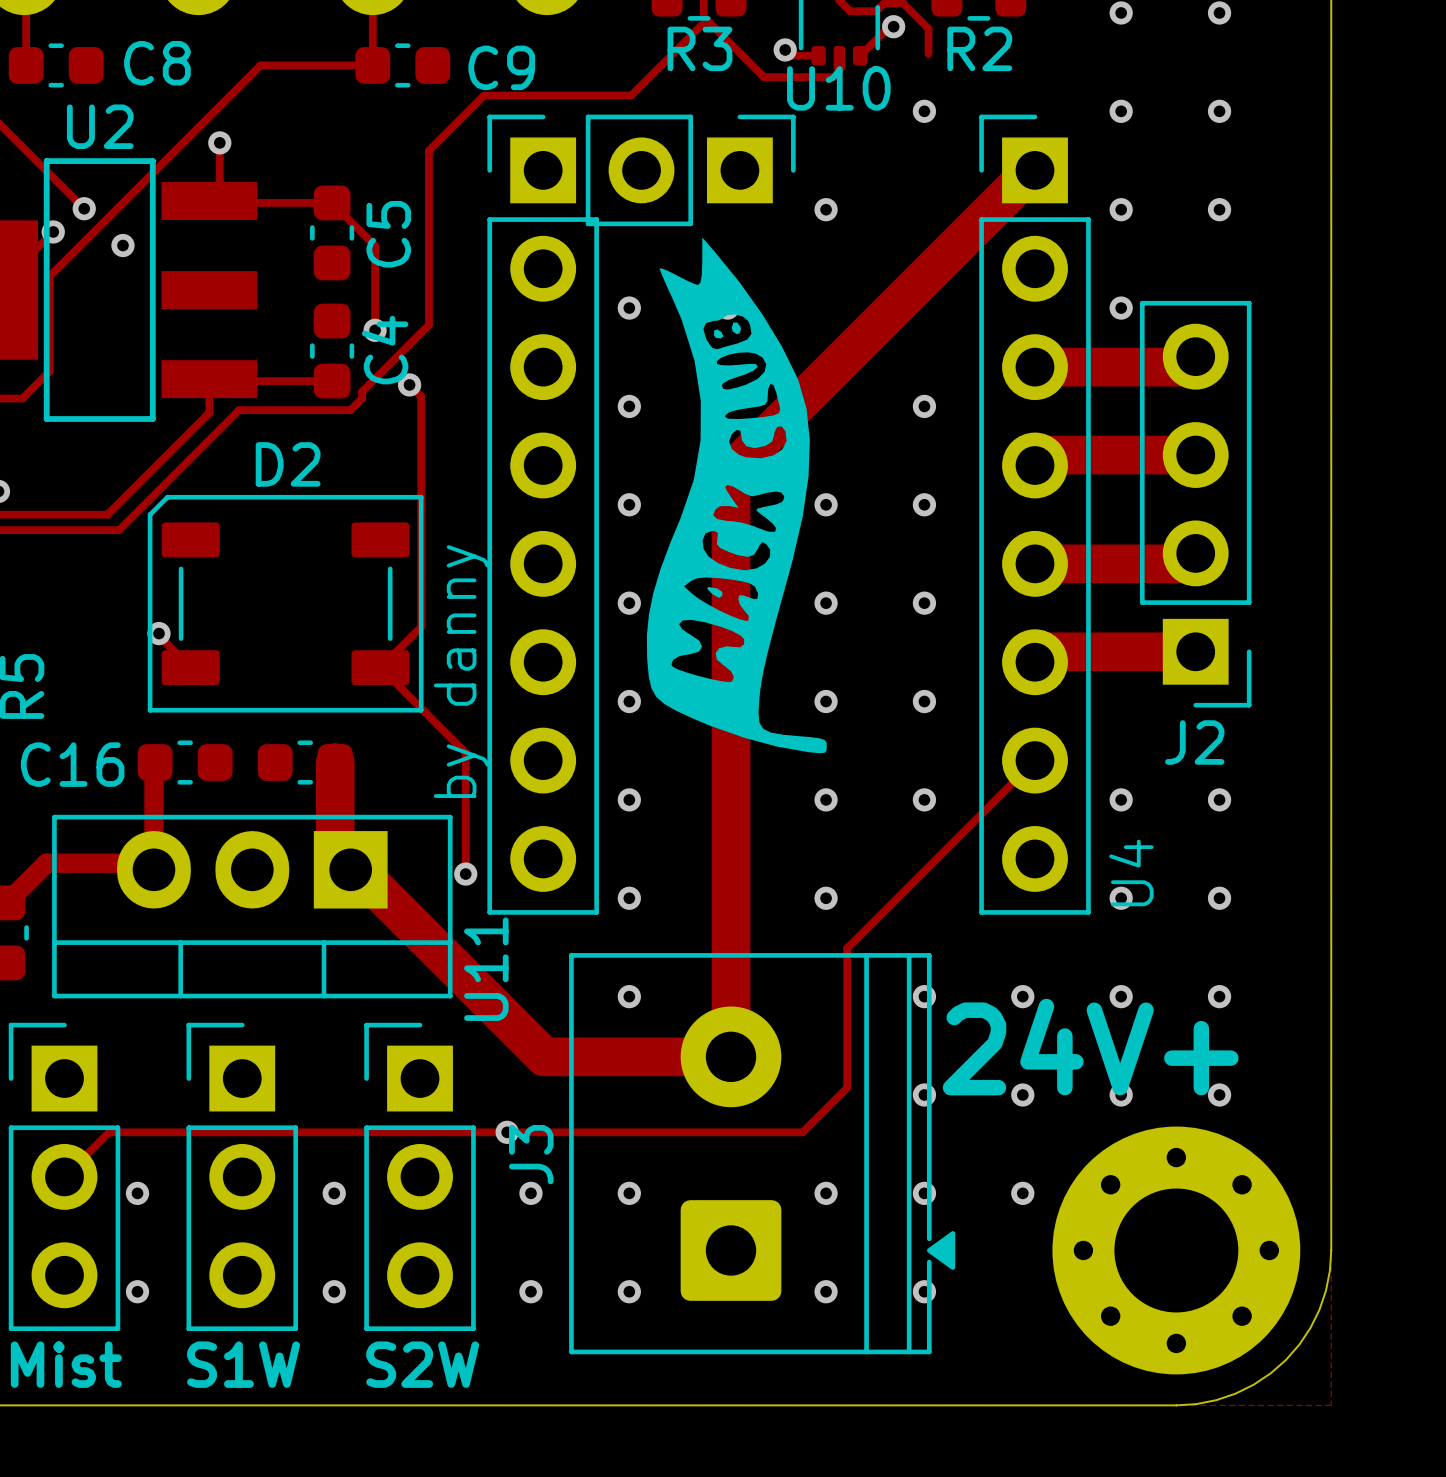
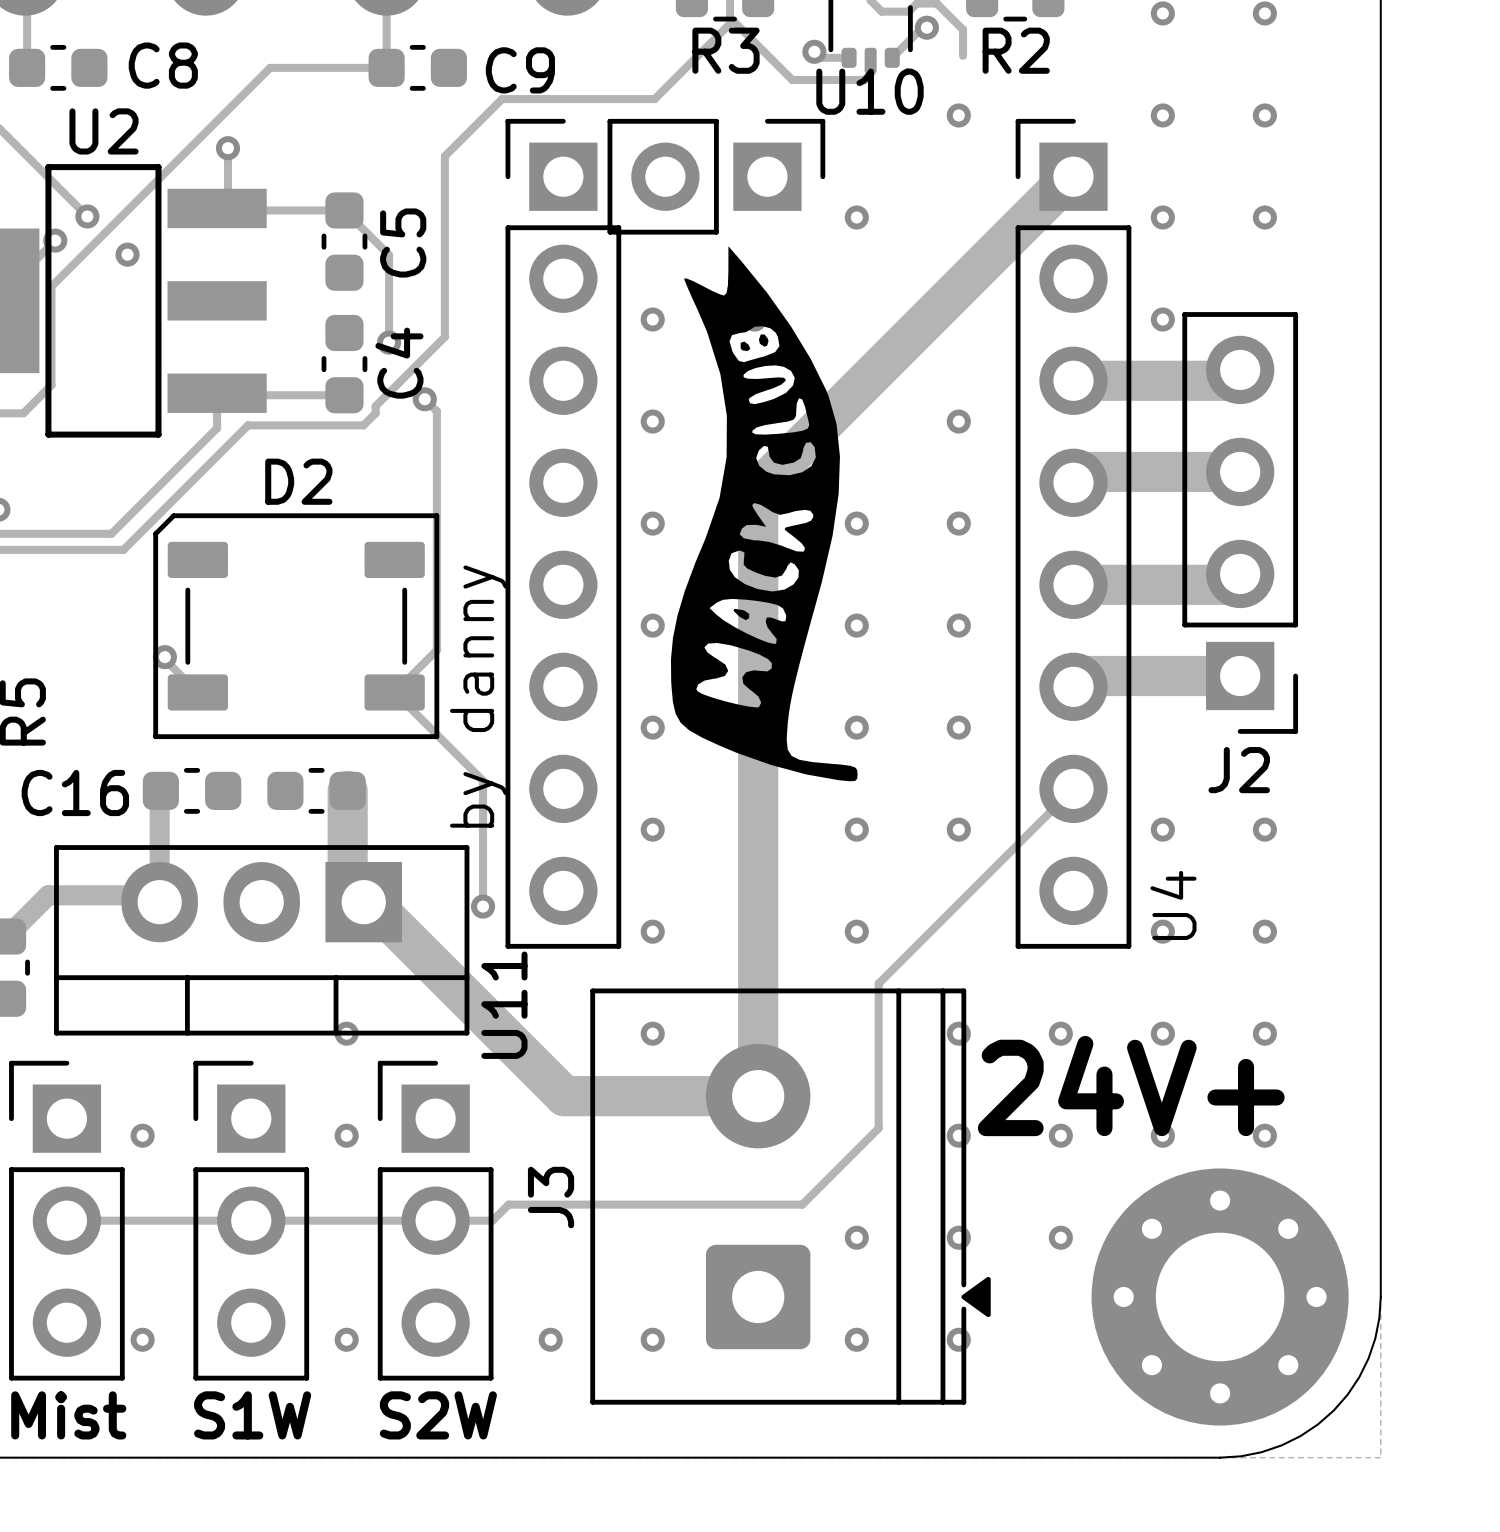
via: none -> (346, 1033)
via: none -> (346, 1135)
via: (507, 1132) -> none
track: (802, 1132) (109, 1132) (64, 1176) -> (832, 1174) (802, 1204) (508, 1204) (492, 1220) (66, 1220)
via position: (137, 1193) -> (142, 1135)
via: (334, 1193) -> none
via: (530, 1193) -> none
via: (629, 1193) -> none

